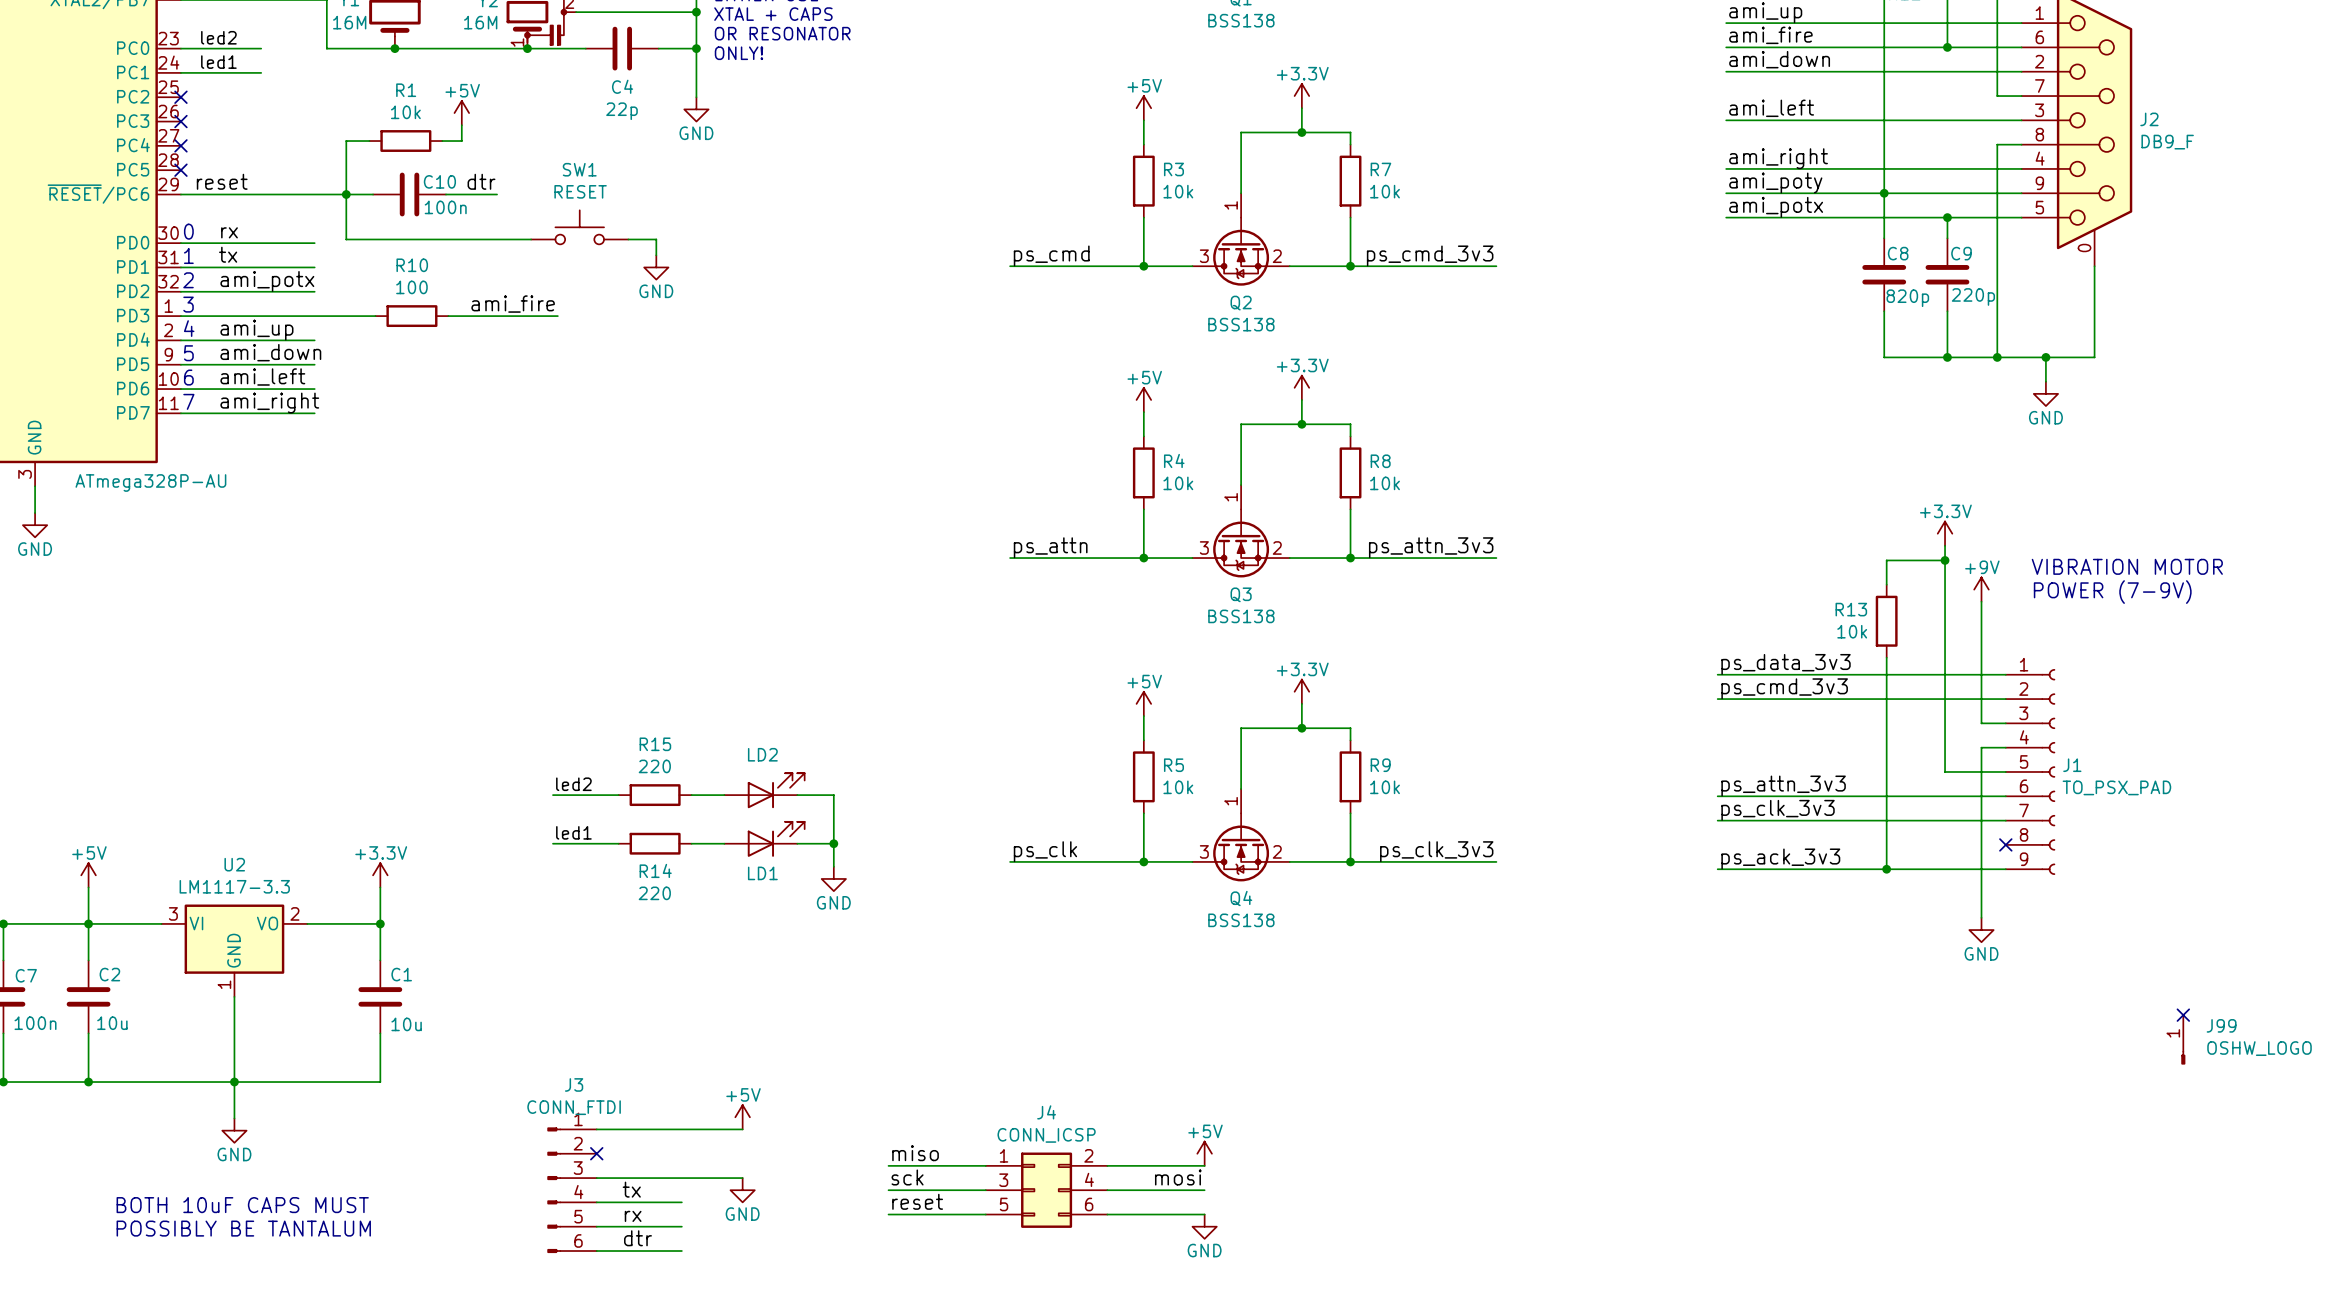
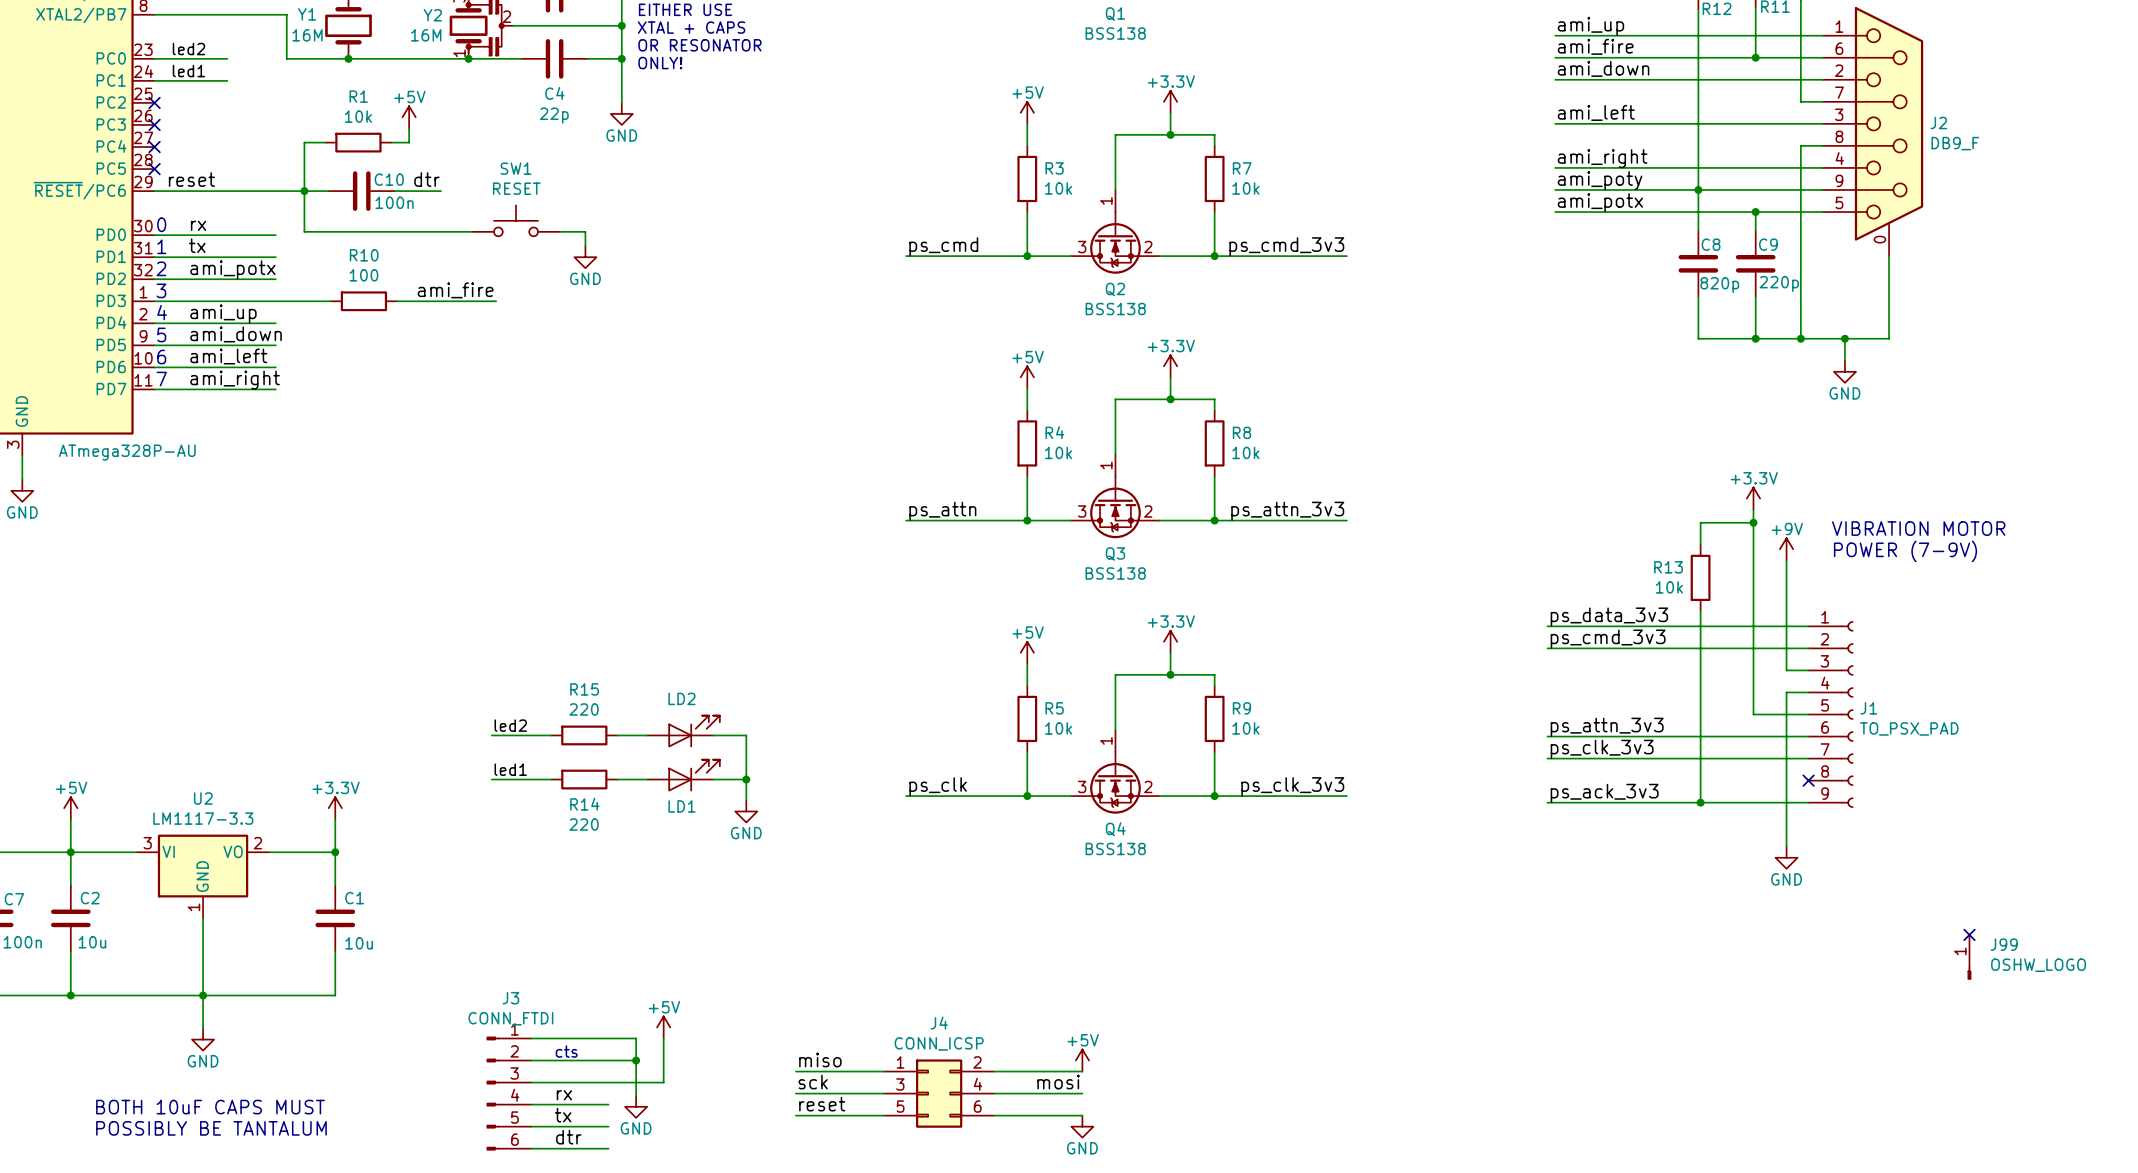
wire: (712, 1129) (742, 1129) -> (663, 1082) (663, 1038)
wire: none -> (636, 1038) (636, 1095)
text: none -> cts (566, 1051)
wire: none -> (531, 1060) (636, 1060)
no-connect mark: (596, 1153) -> none
junction: none -> (636, 1060)
label: tx (631, 1189) -> rx (564, 1095)
power symbol position: GND (742, 1190) -> GND (636, 1106)
label: rx (633, 1216) -> tx (563, 1115)

